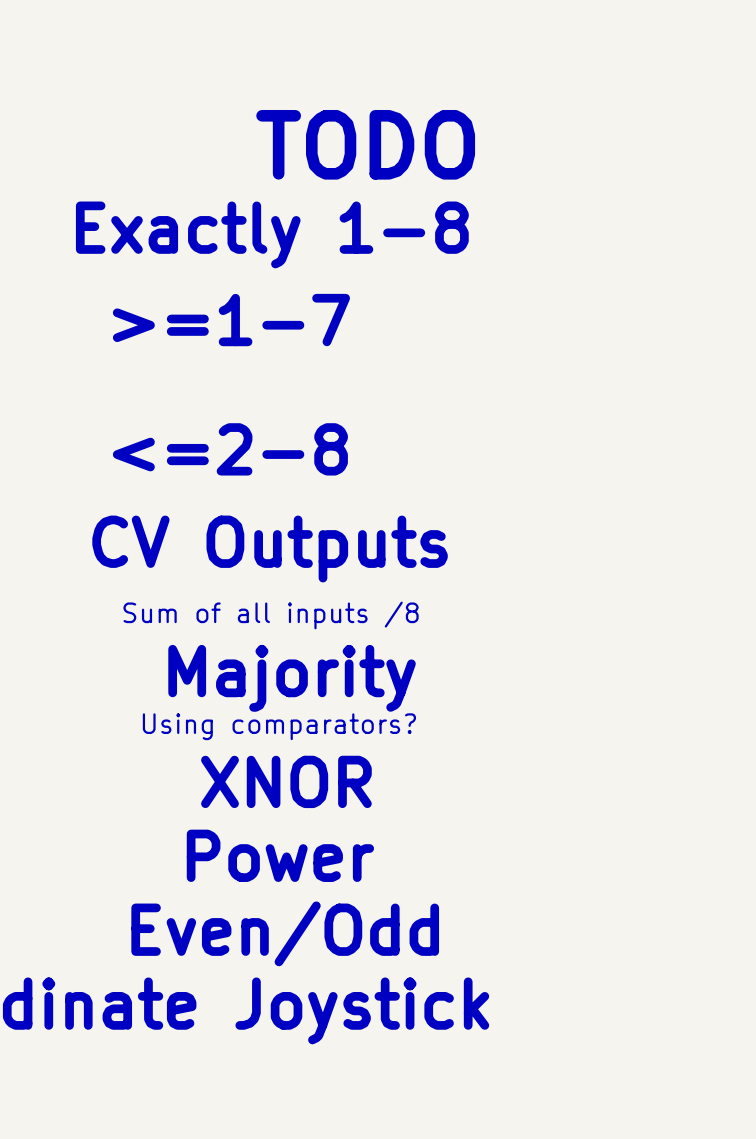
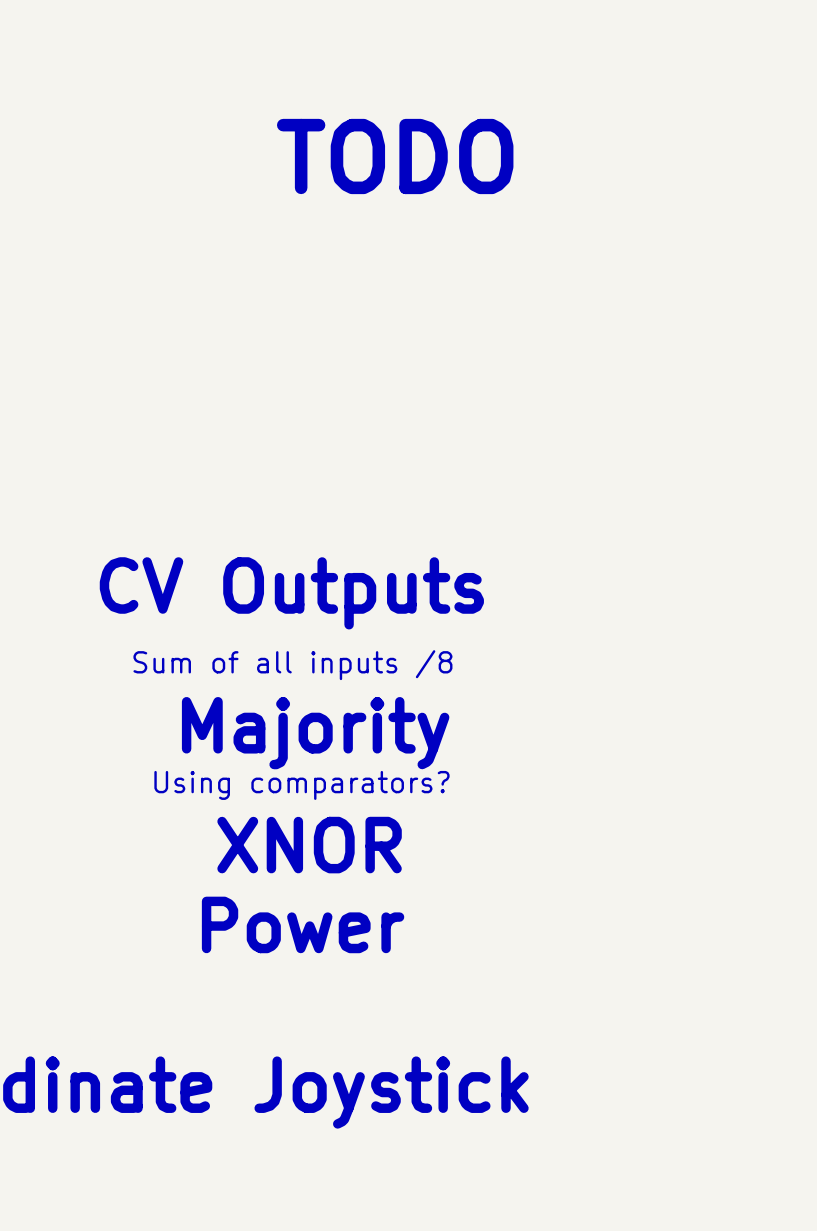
text: Exactly 1-8 (272, 234) -> none
text: >=1-7 (231, 320) -> none
text: <=2-8 (230, 449) -> none
text: Even/Odd (285, 933) -> none

